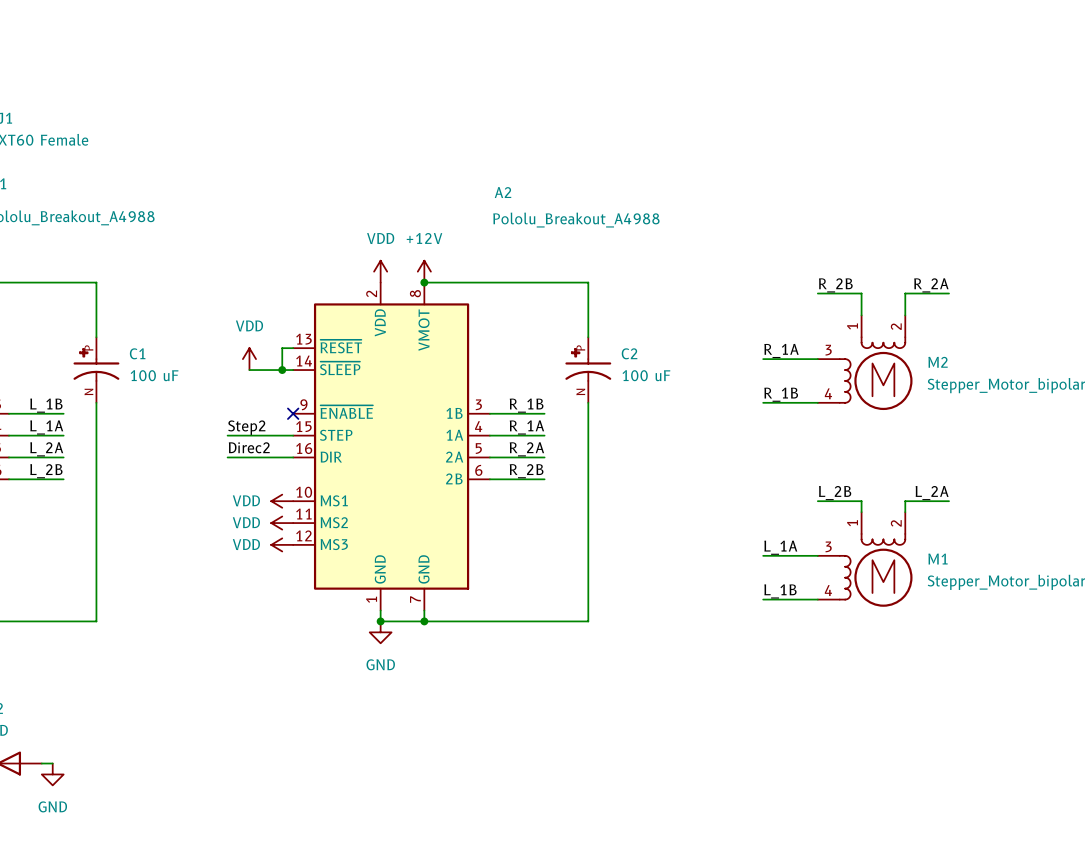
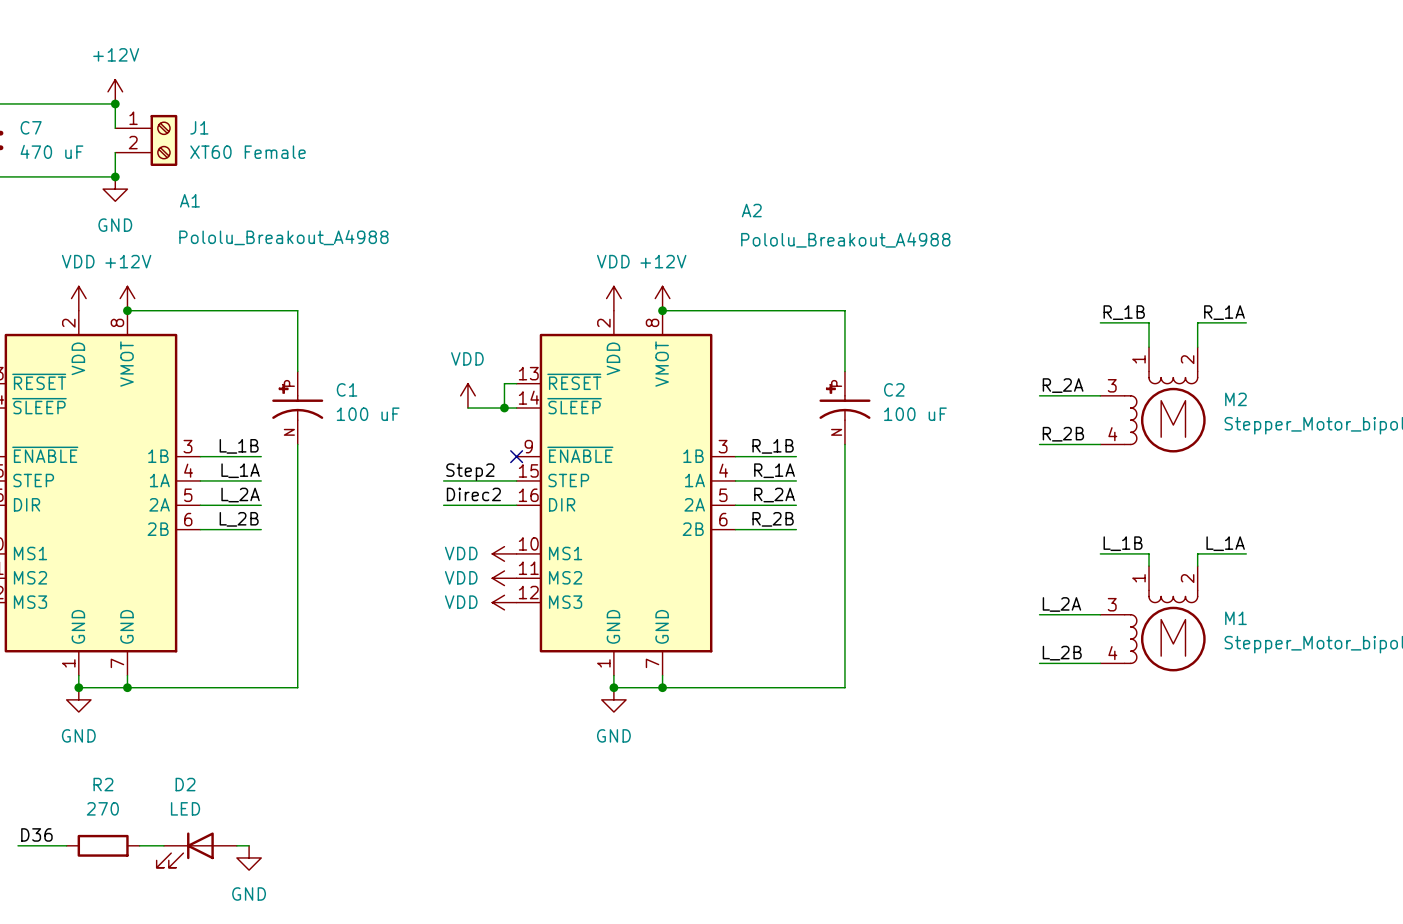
label: R_2B (835, 285) -> R_1B (1124, 312)
label: R_2A (931, 285) -> R_1A (1224, 312)
label: R_1A (781, 350) -> R_2A (1063, 385)
label: R_1B (781, 394) -> R_2B (1063, 434)
label: L_2B (835, 493) -> L_1B (1123, 543)
label: L_2A (932, 493) -> L_1A (1225, 543)
label: L_1A (780, 547) -> L_2A (1061, 604)
label: L_1B (780, 591) -> L_2B (1062, 653)

